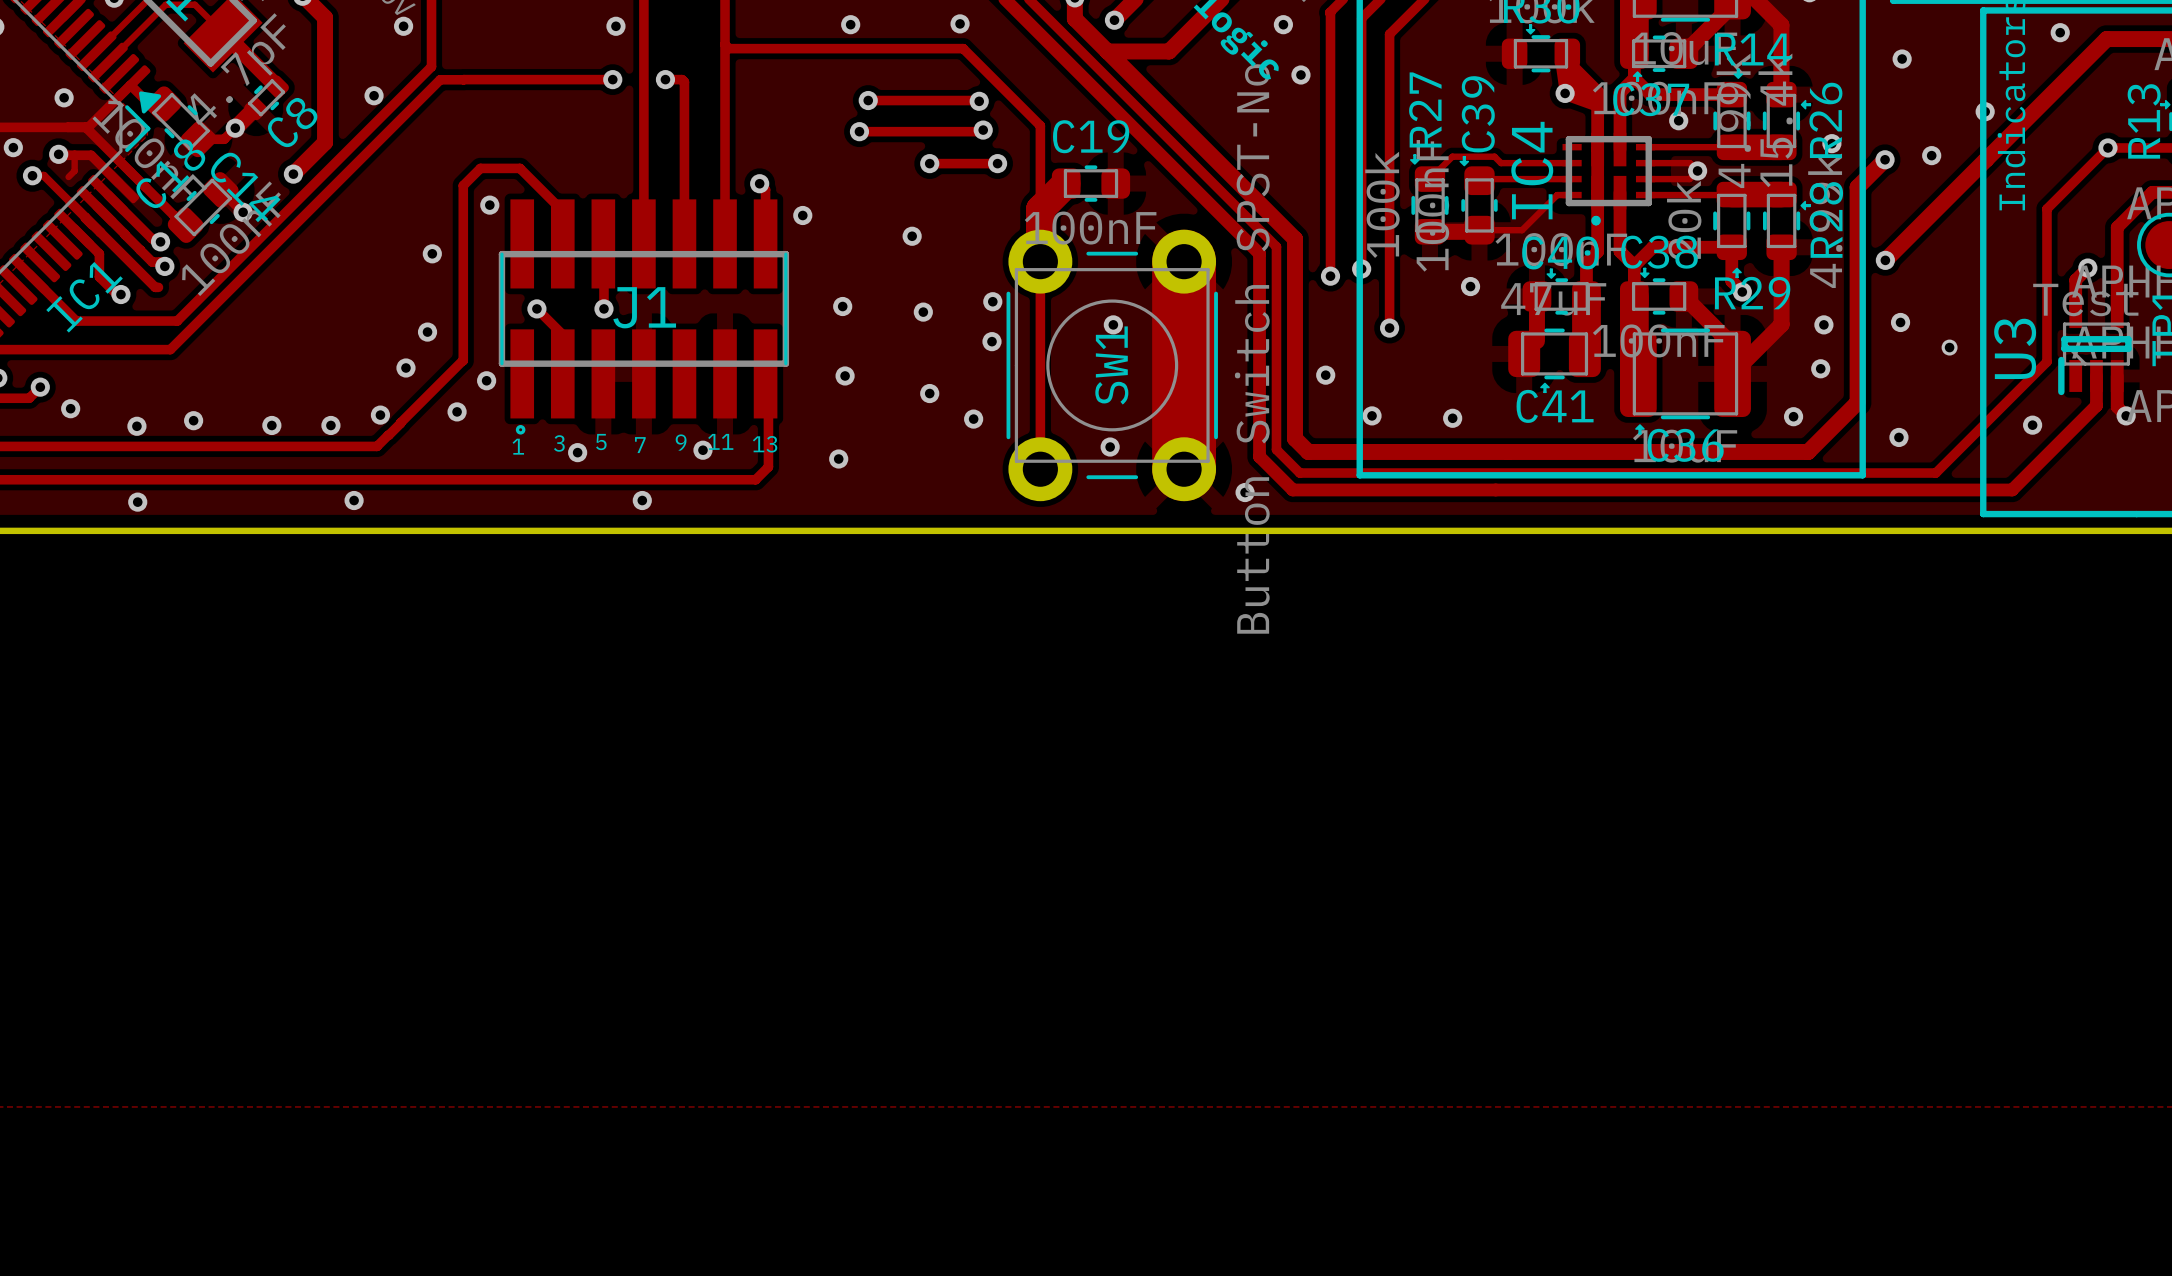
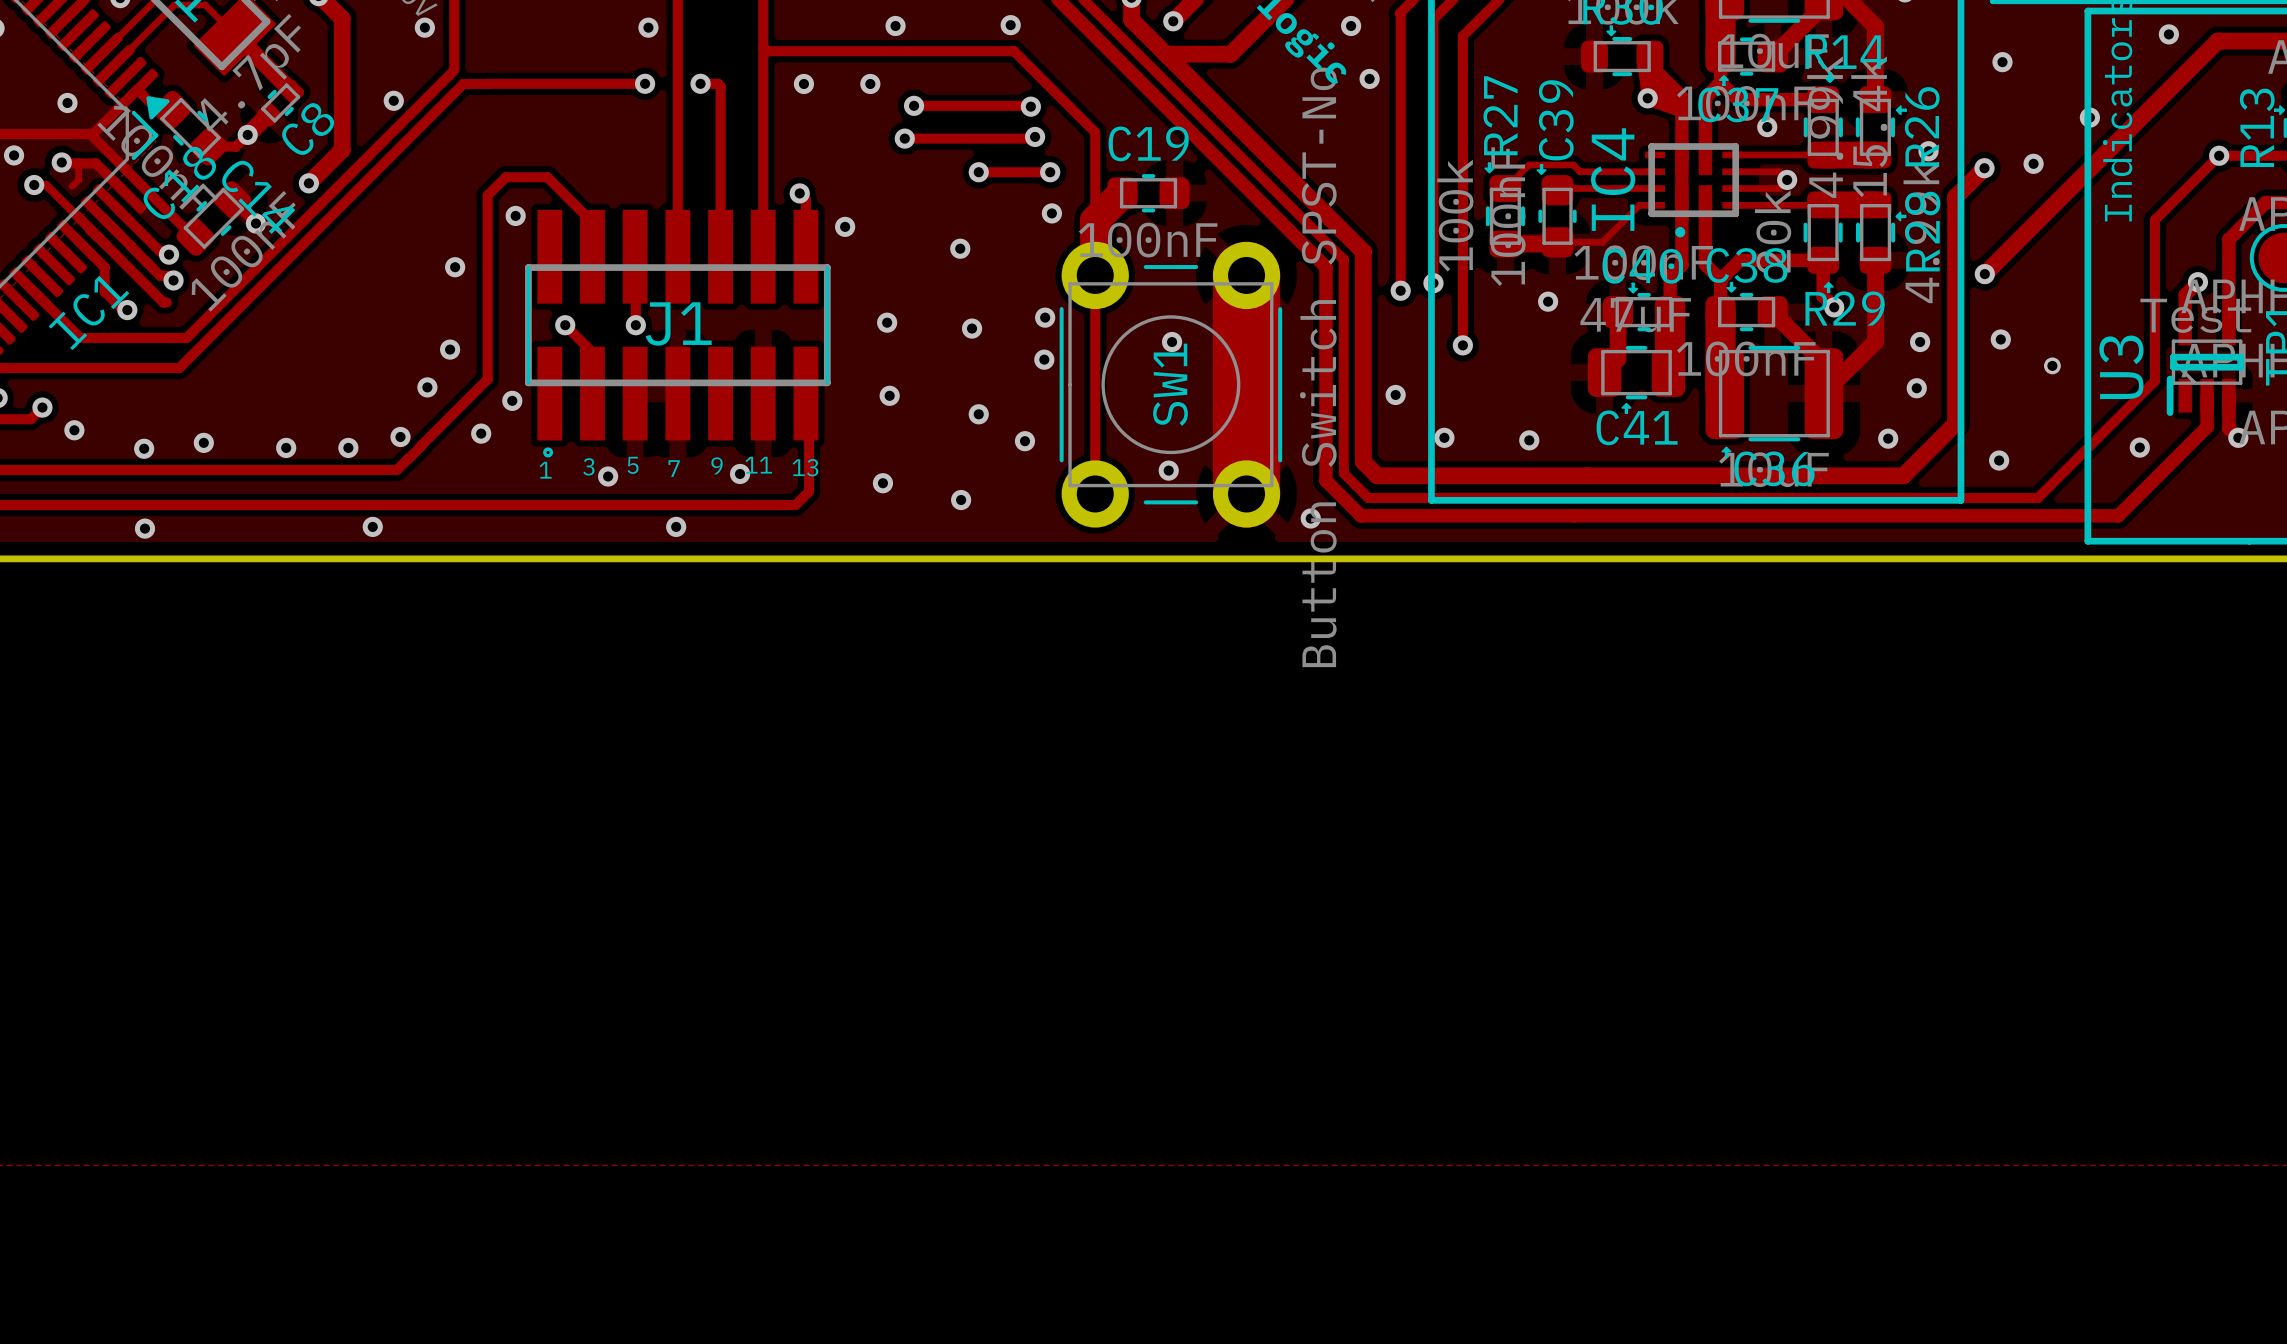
via: none -> (803, 83)
via: none -> (870, 83)
via: none -> (1051, 213)
via: none -> (961, 500)

